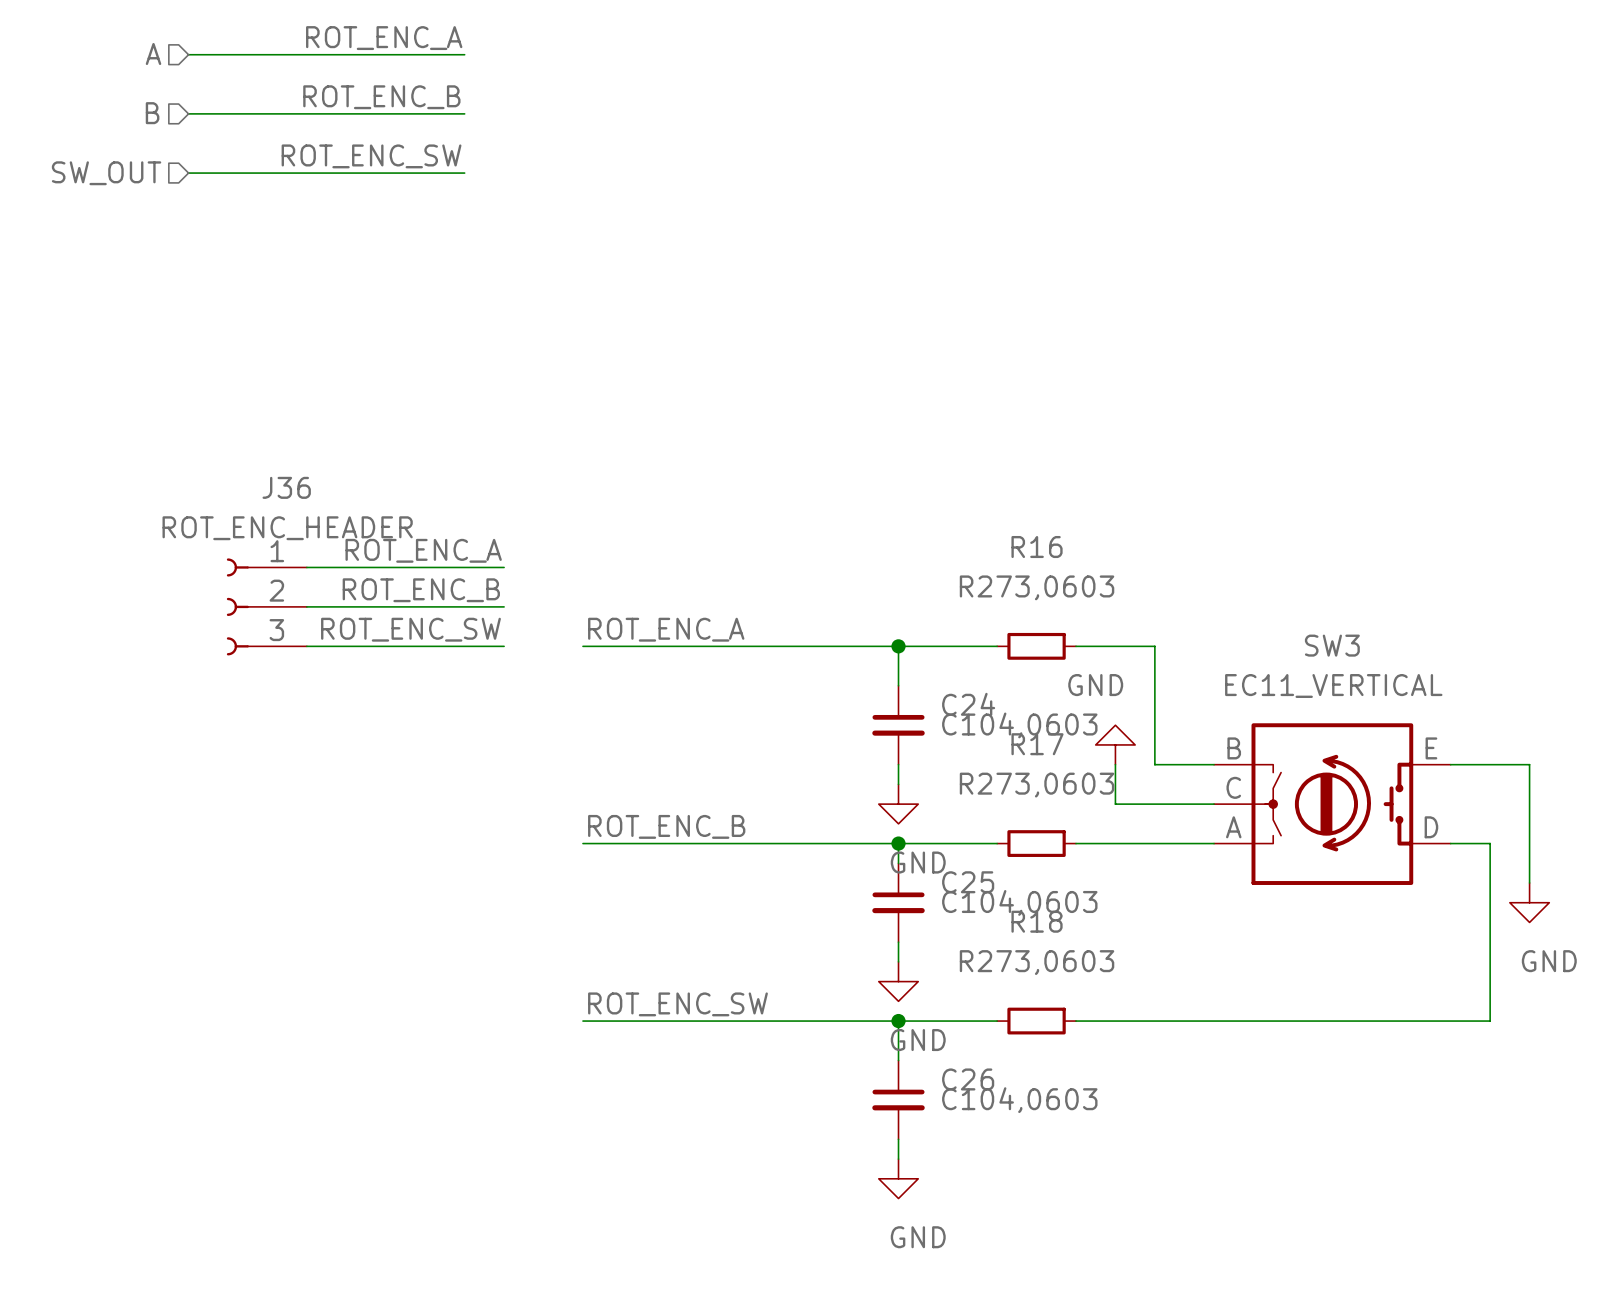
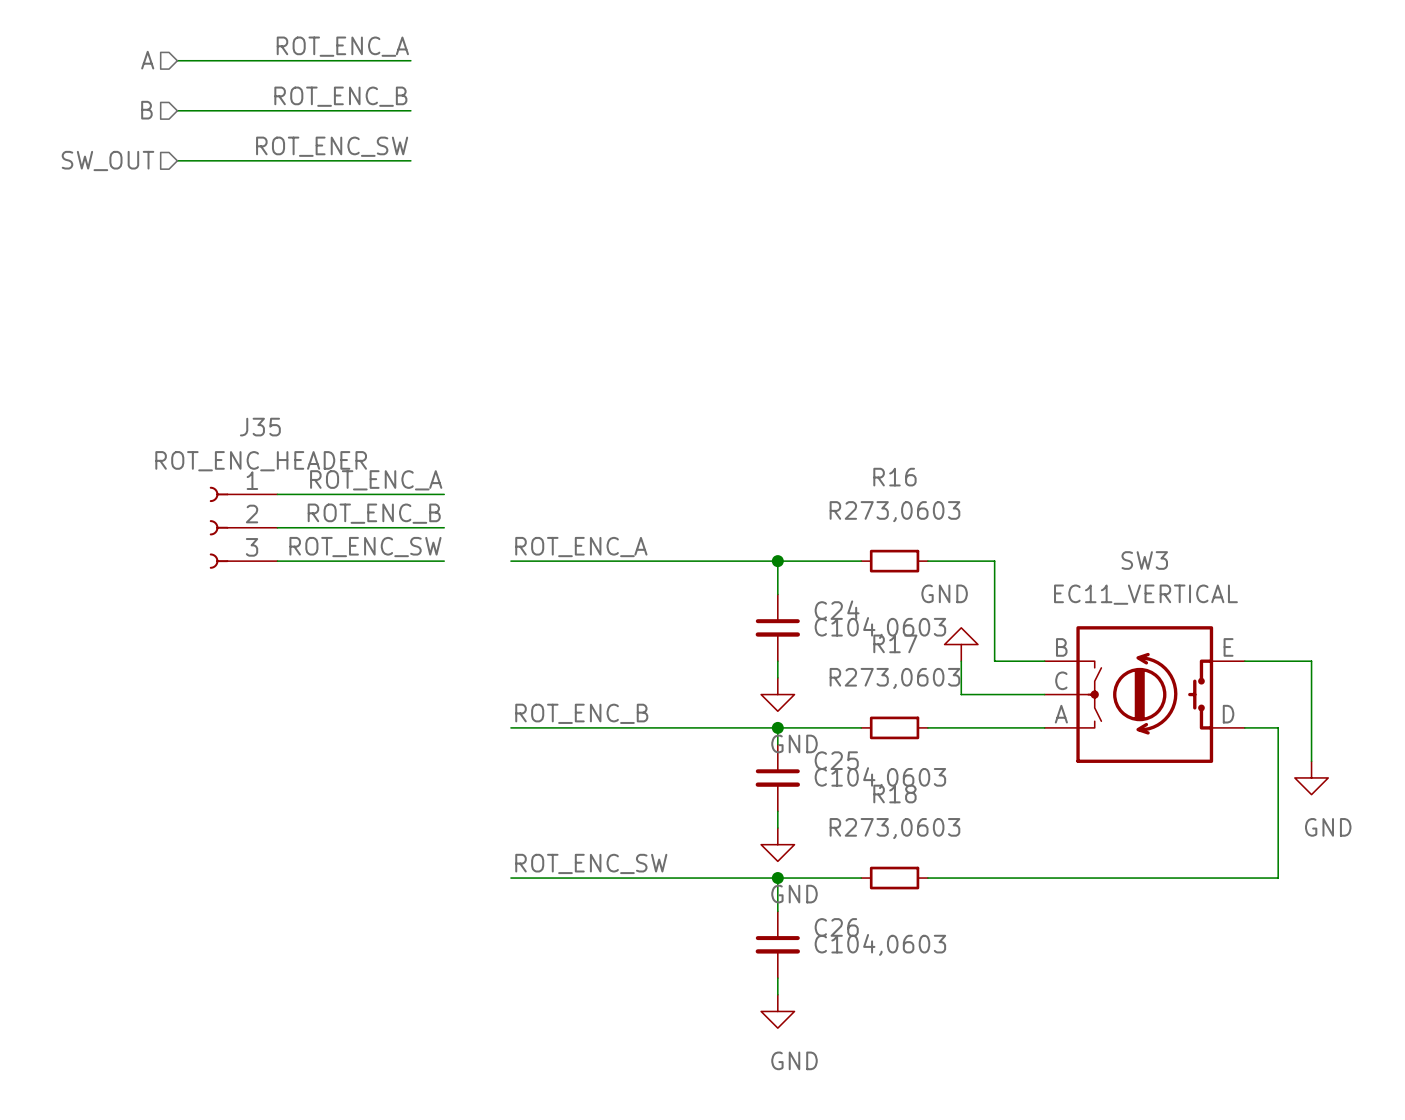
J36 name: J36 (286, 487) -> J35 (260, 427)

